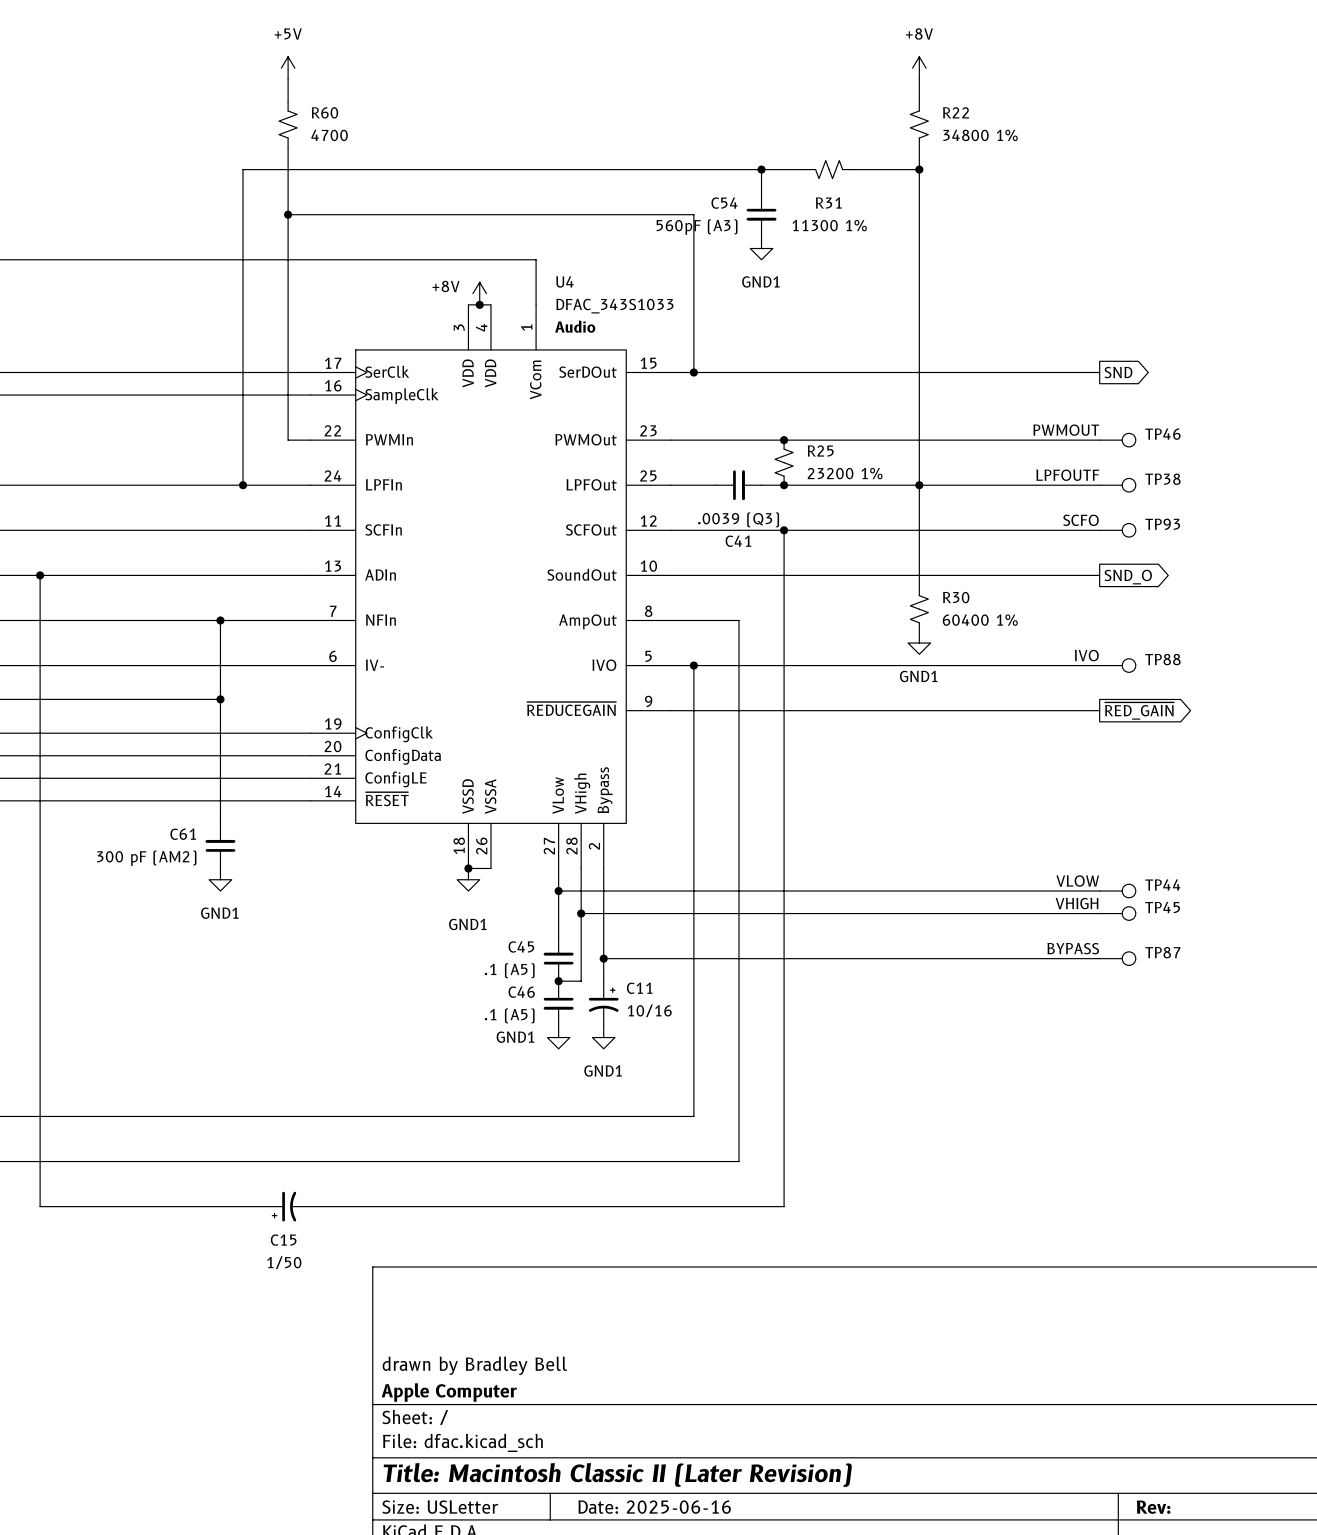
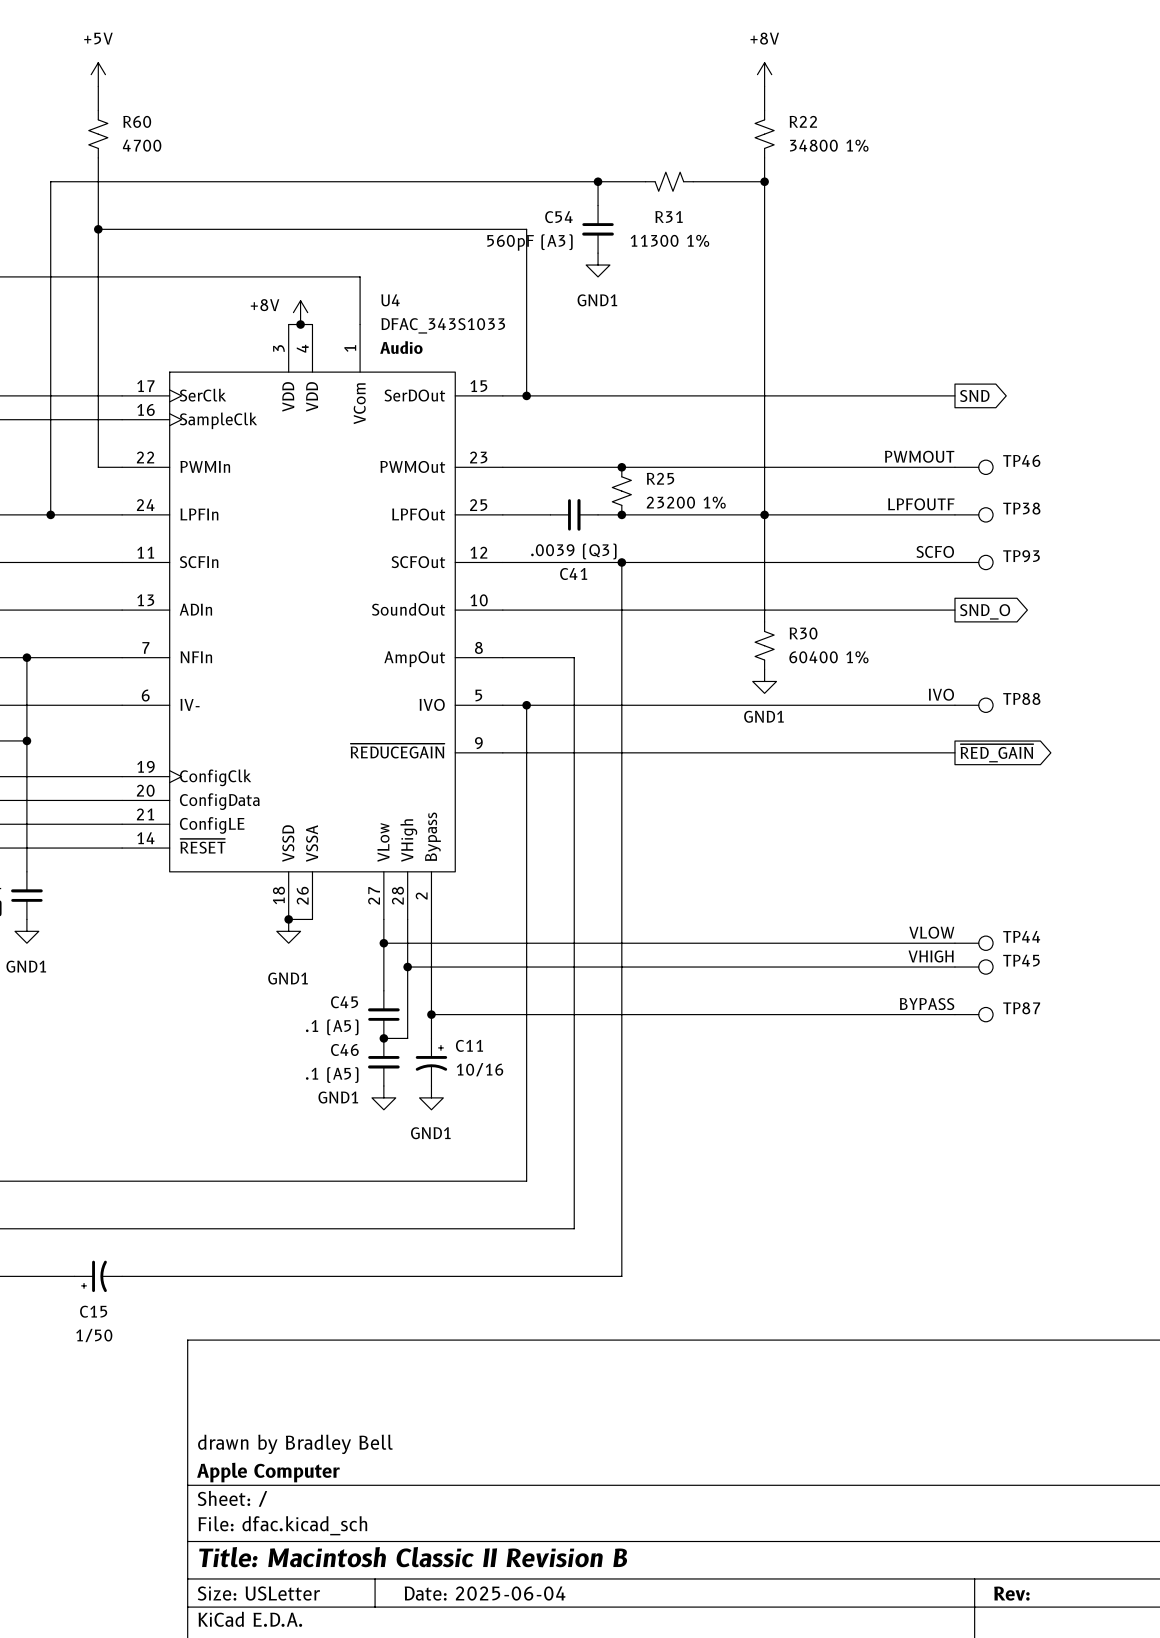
title block: Title: Macintosh Classic II (Later Revision) (617, 1474) -> Title: Macintosh Classic II Revision B (413, 1557)
title block: Date: 2025-06-16 (654, 1507) -> Date: 2025-06-04 (485, 1593)

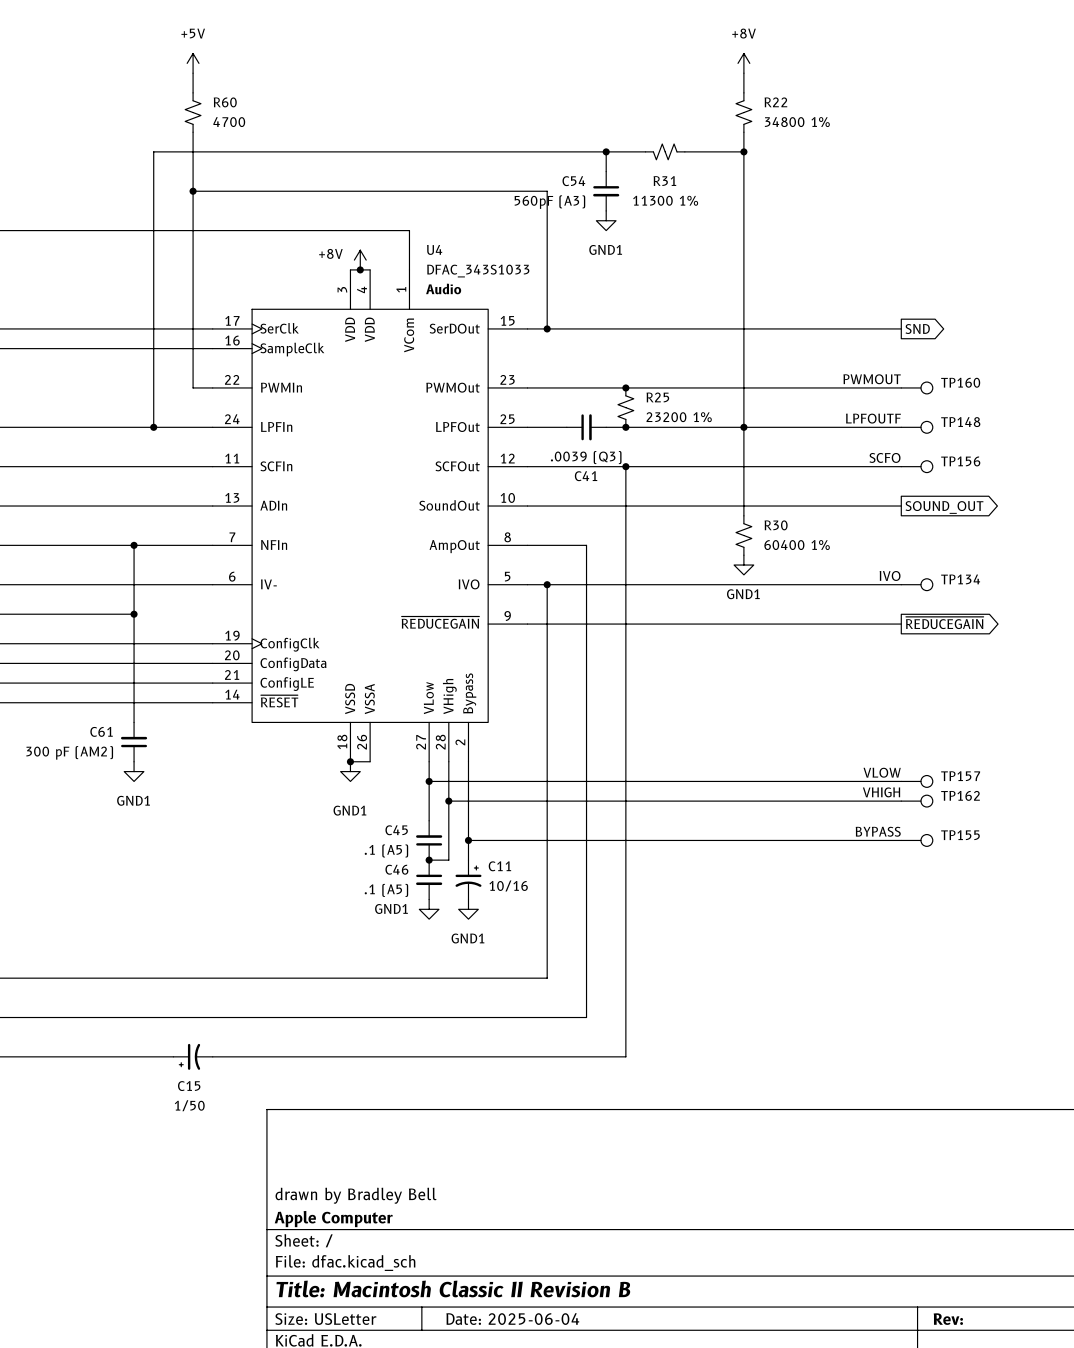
TP46 name: TP46 (1021, 460) -> TP160 (960, 382)
TP38 name: TP38 (1021, 508) -> TP148 (960, 422)
TP93 name: TP93 (1021, 556) -> TP156 (960, 461)
global label: SND_O (985, 611) -> SOUND_OUT (944, 507)
TP88 name: TP88 (1021, 698) -> TP134 (960, 579)
global label: ~{RED_GAIN} (997, 753) -> ~{REDUCEGAIN} (944, 622)
TP44 name: TP44 (1021, 936) -> TP157 (960, 776)
TP45 name: TP45 (1021, 960) -> TP162 (960, 795)
TP87 name: TP87 (1021, 1008) -> TP155 (960, 835)

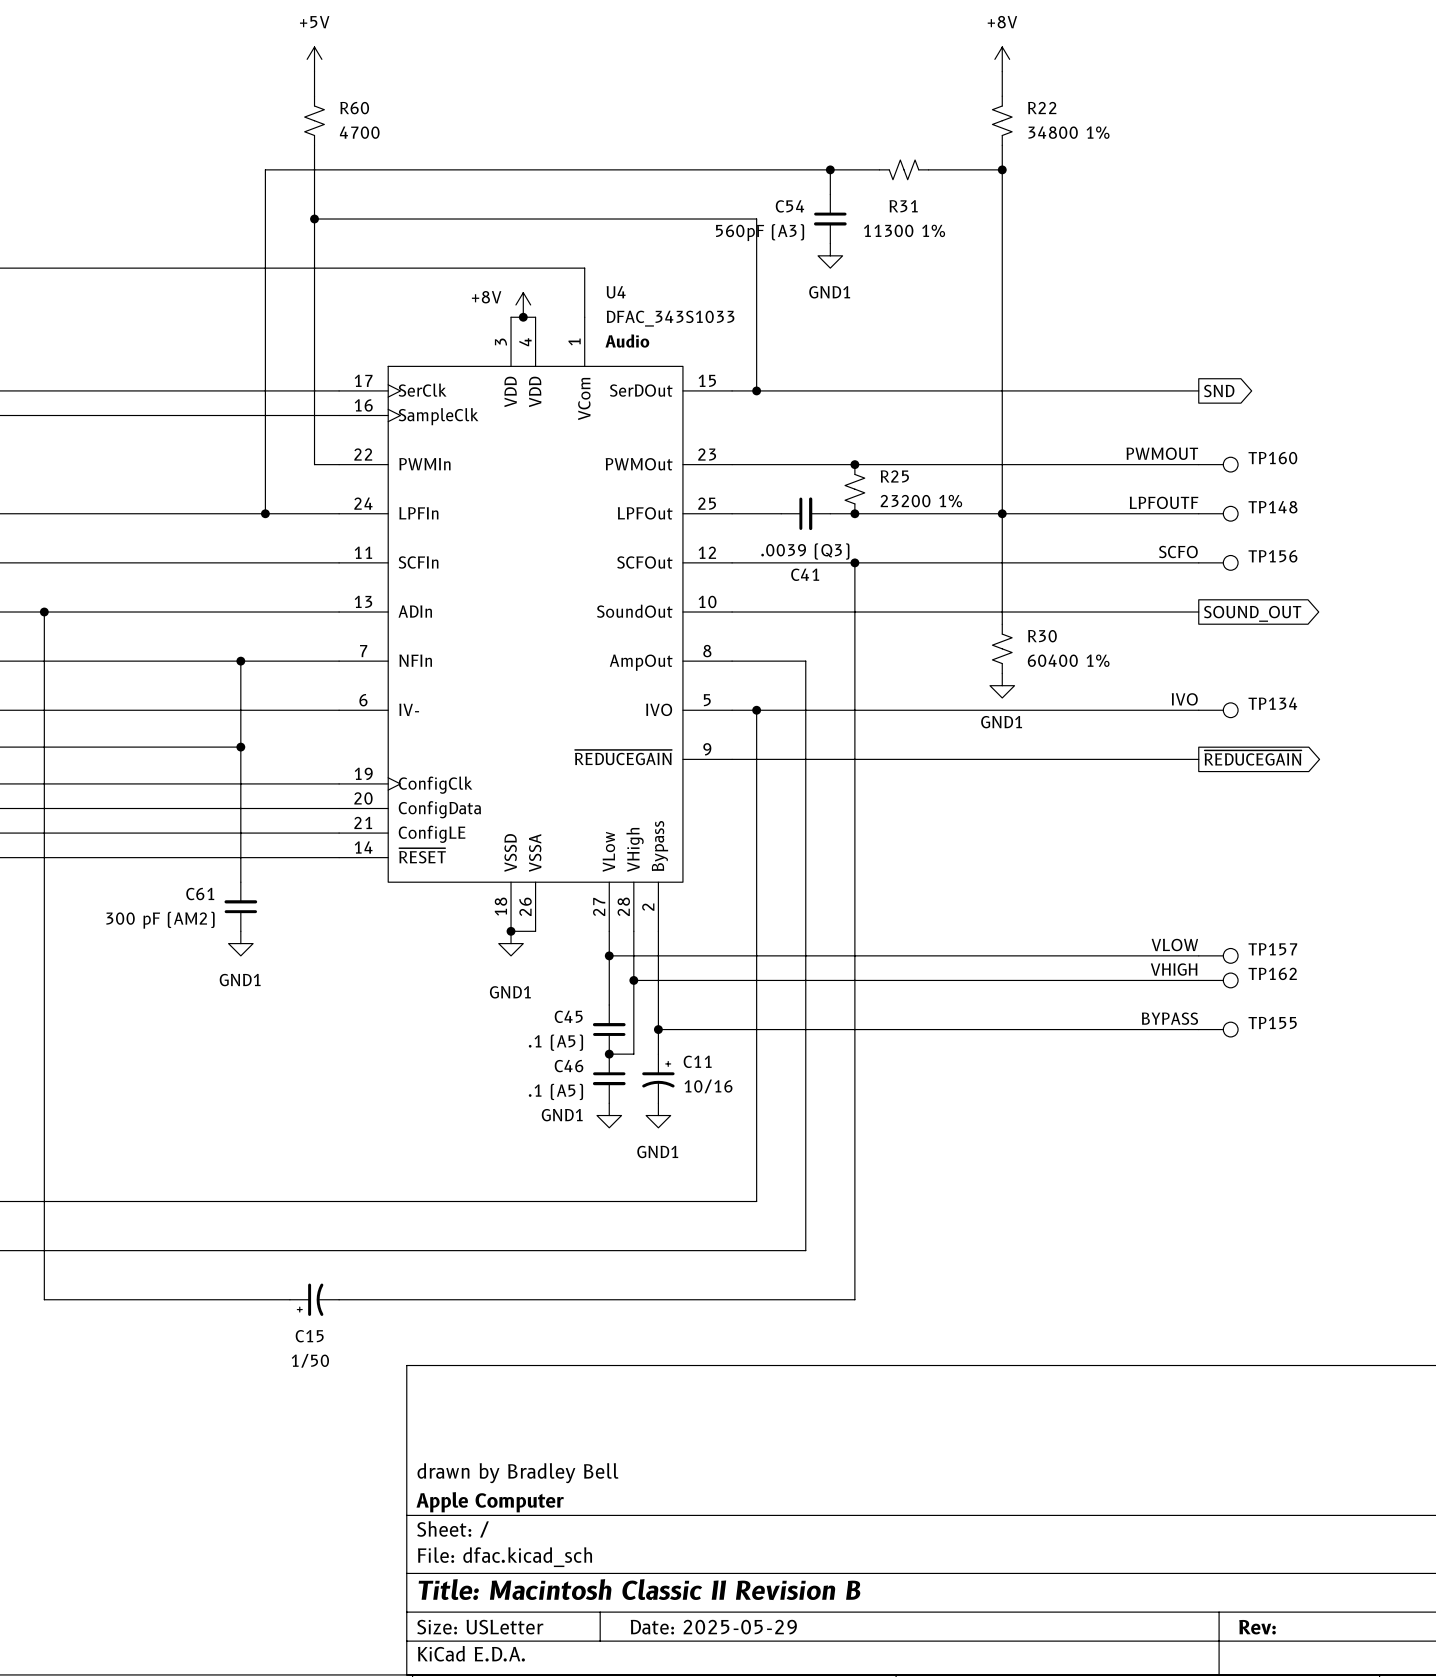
title block: Date: 2025-06-04 (512, 1319) -> Date: 2025-05-29 (713, 1627)

